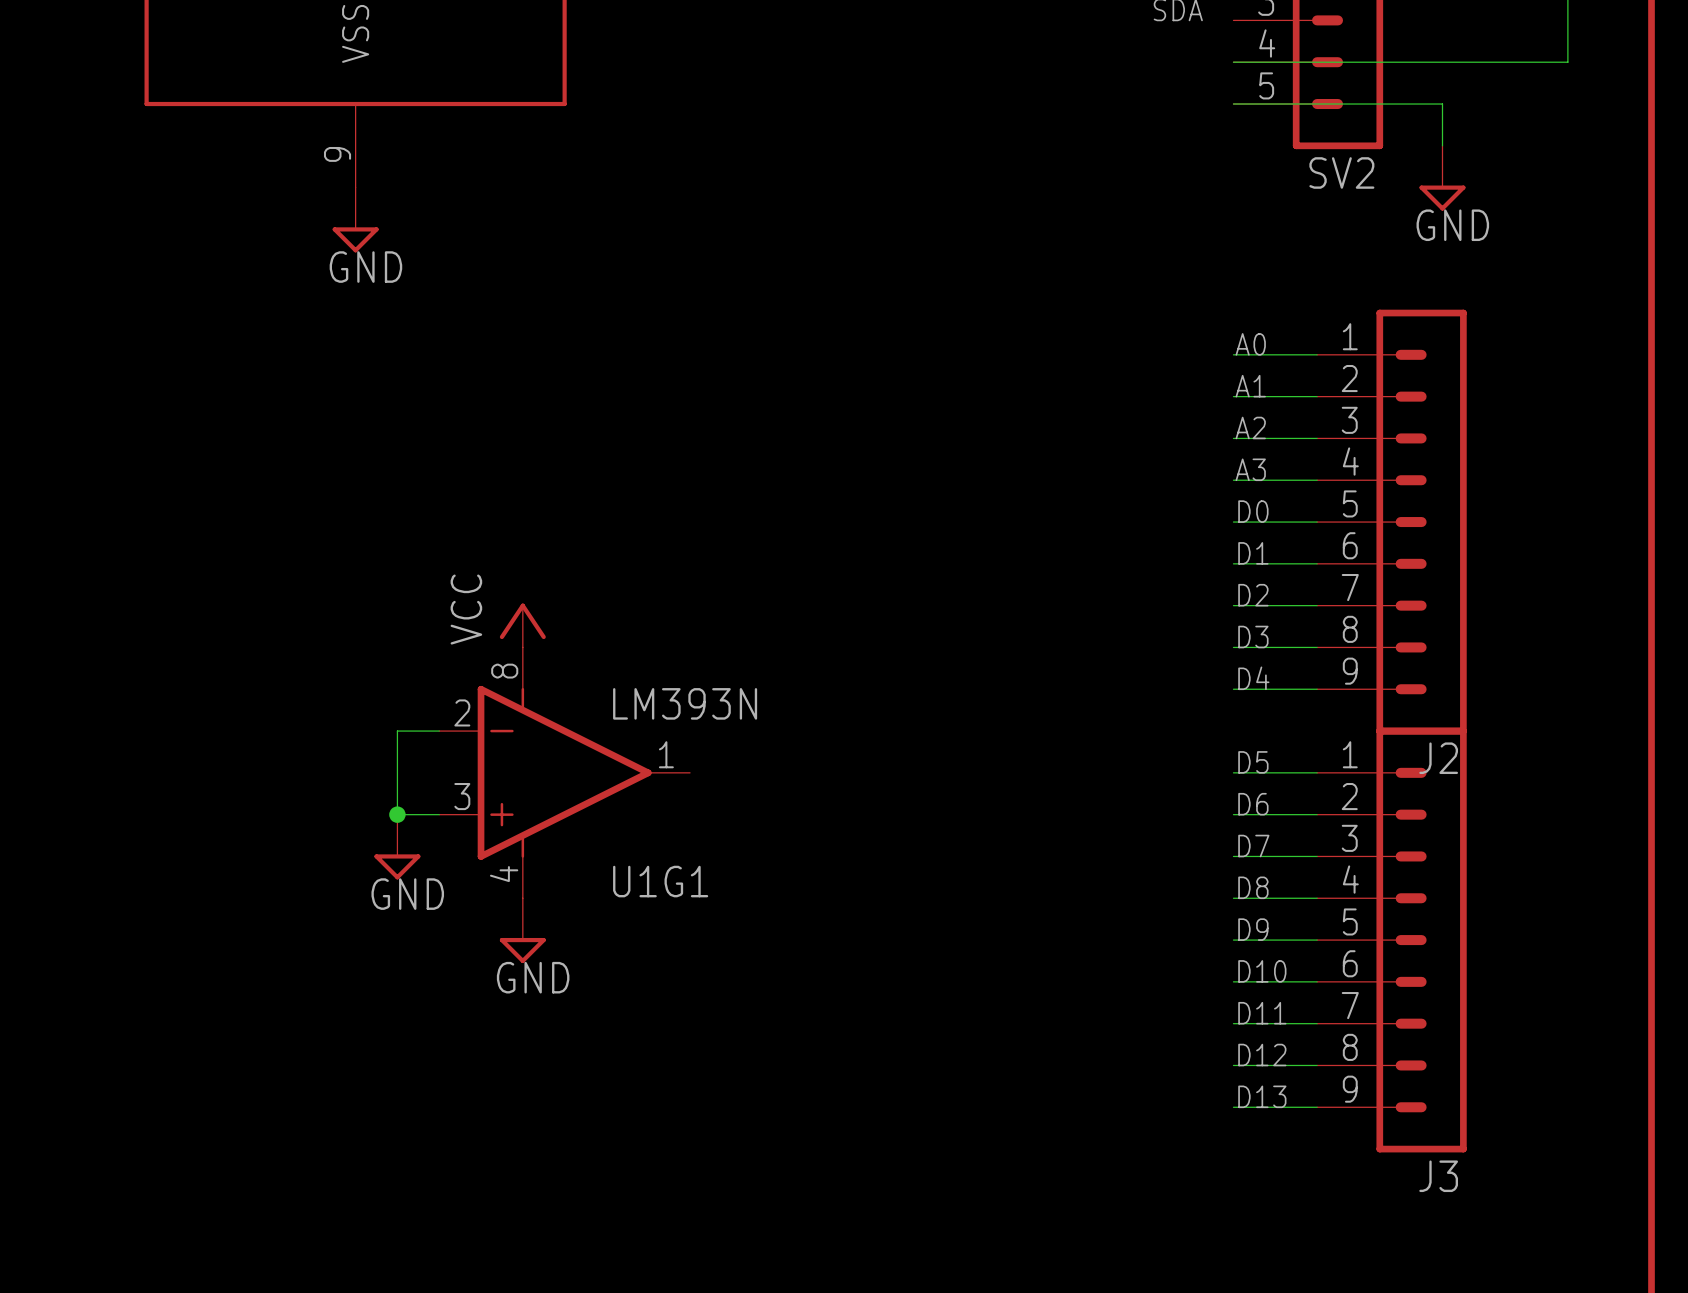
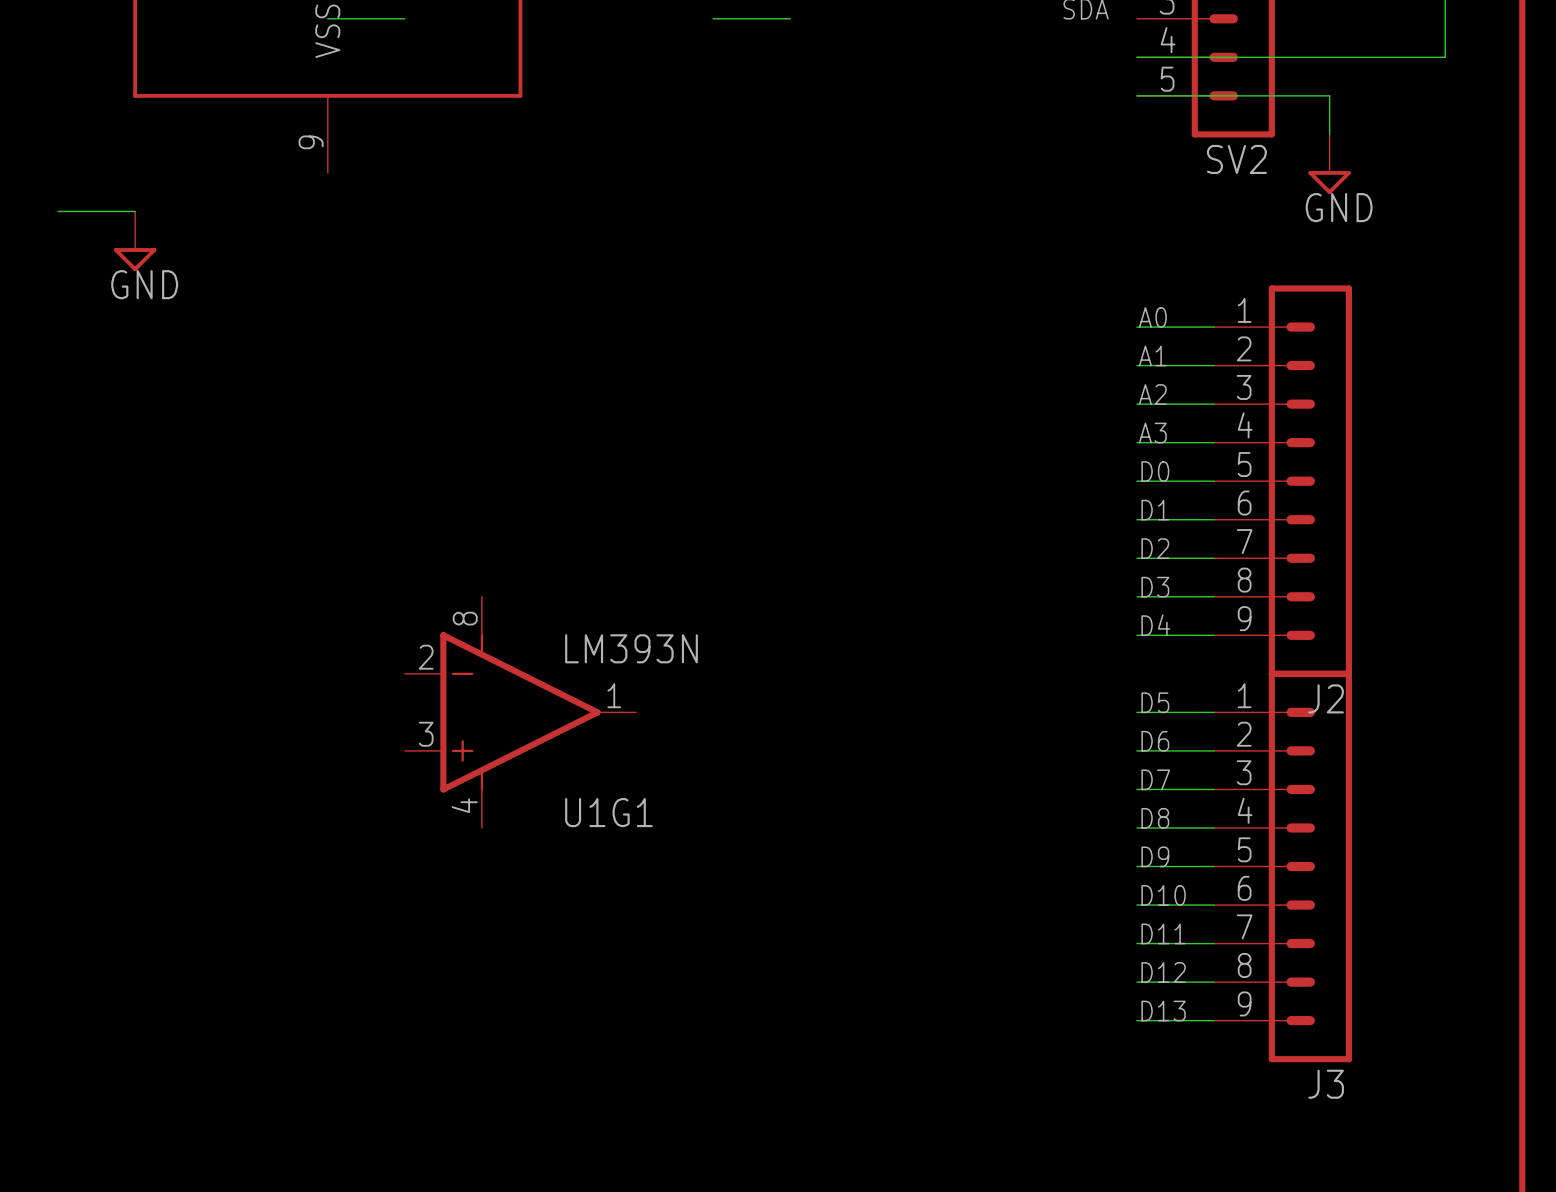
wire: none -> (327, 18) (404, 18)
wire: none -> (713, 18) (790, 18)
power symbol position: GND (355, 220) -> GND (135, 241)
wire: none -> (58, 211) (135, 211)
power symbol: VCC (522, 625) -> none
wire: (439, 731) (397, 731) (397, 814) (439, 814) -> none
junction: (397, 814) -> none
power symbol: GND (397, 847) -> none
power symbol: GND (522, 930) -> none

